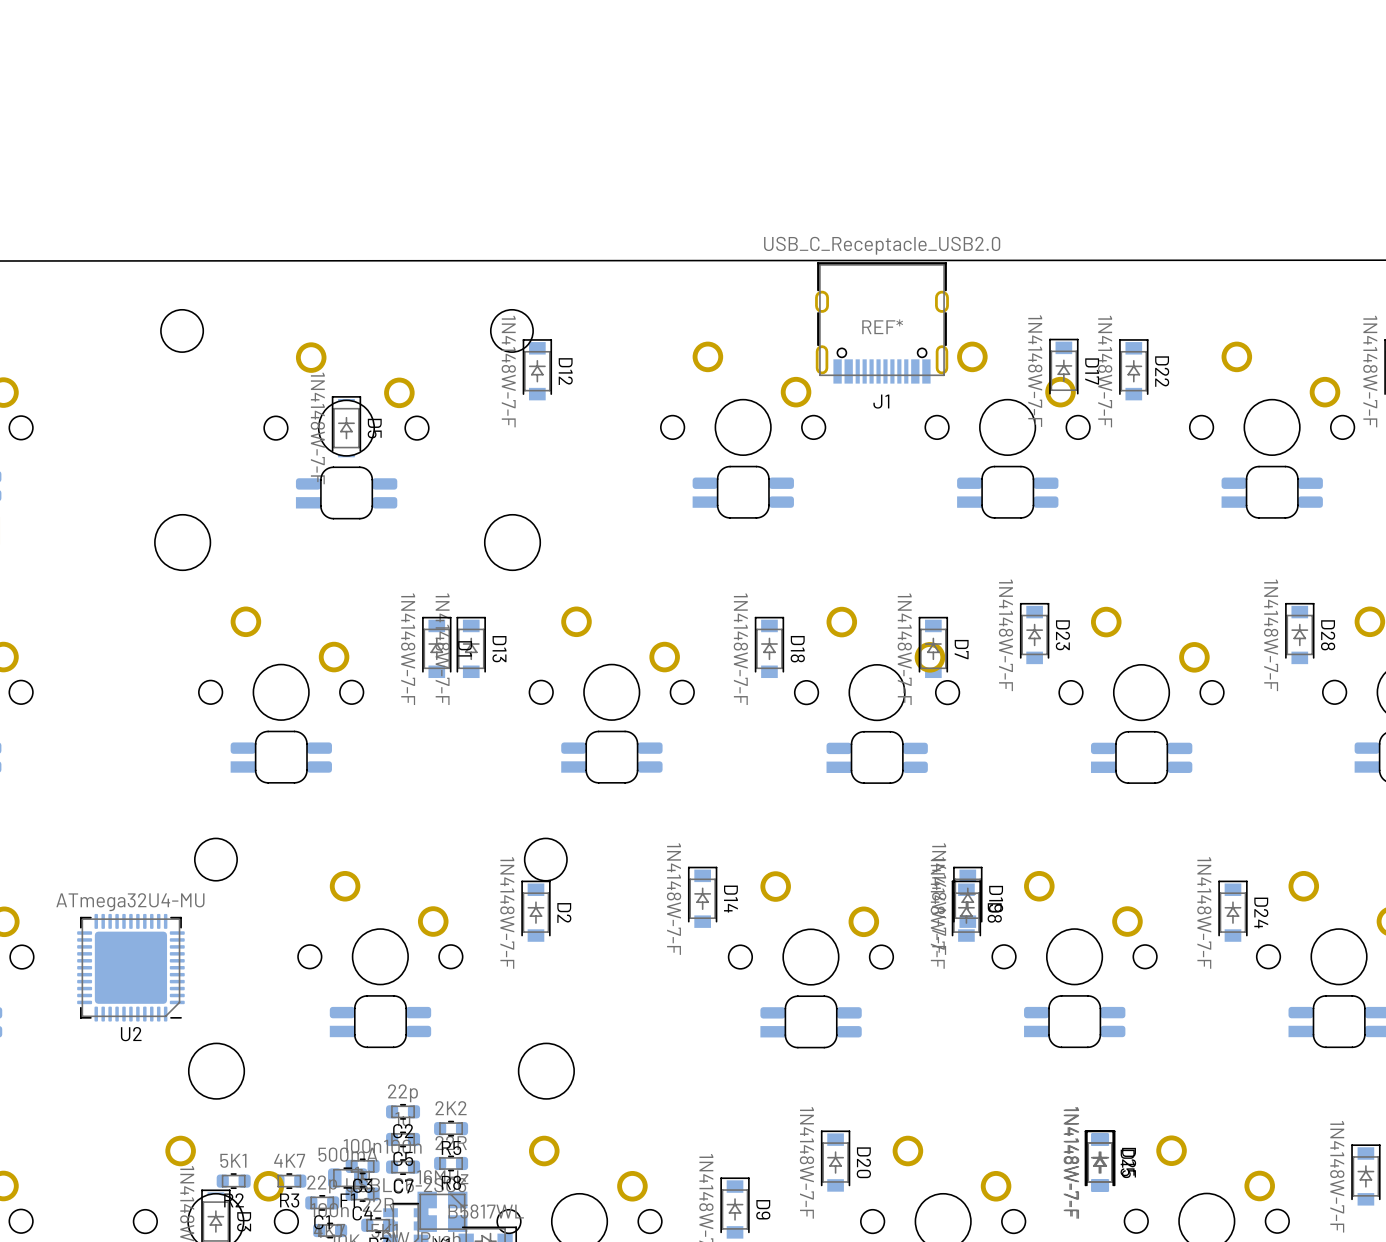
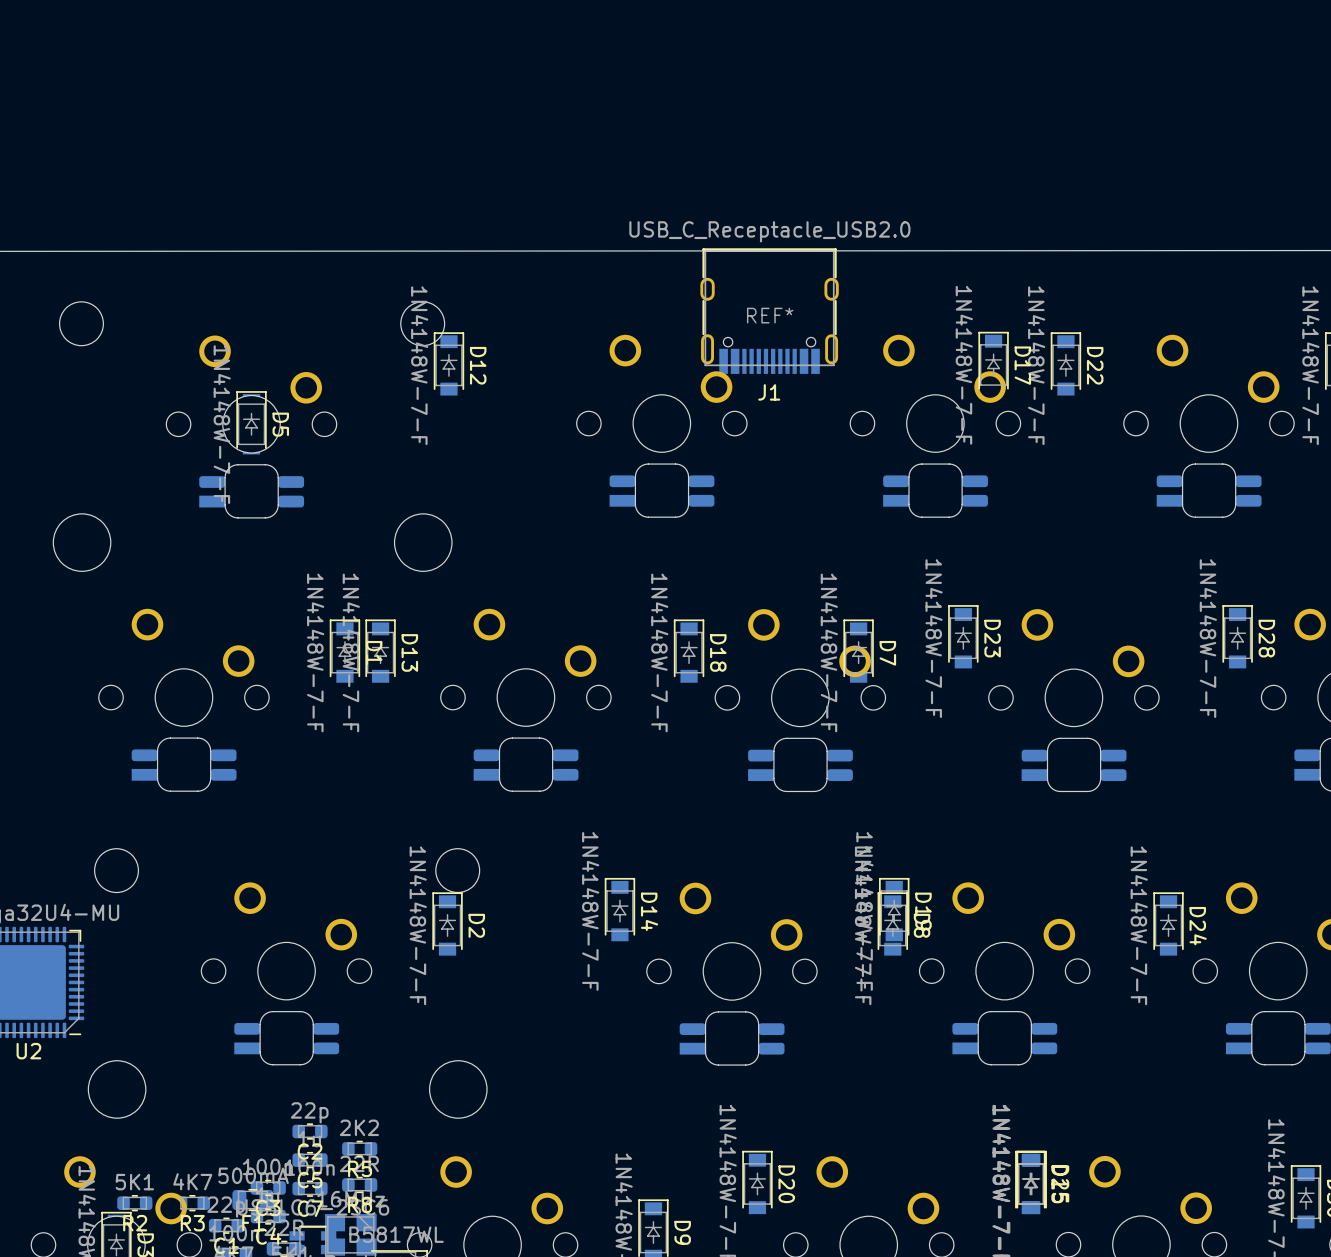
J1 position: (882, 322) -> (769, 311)

